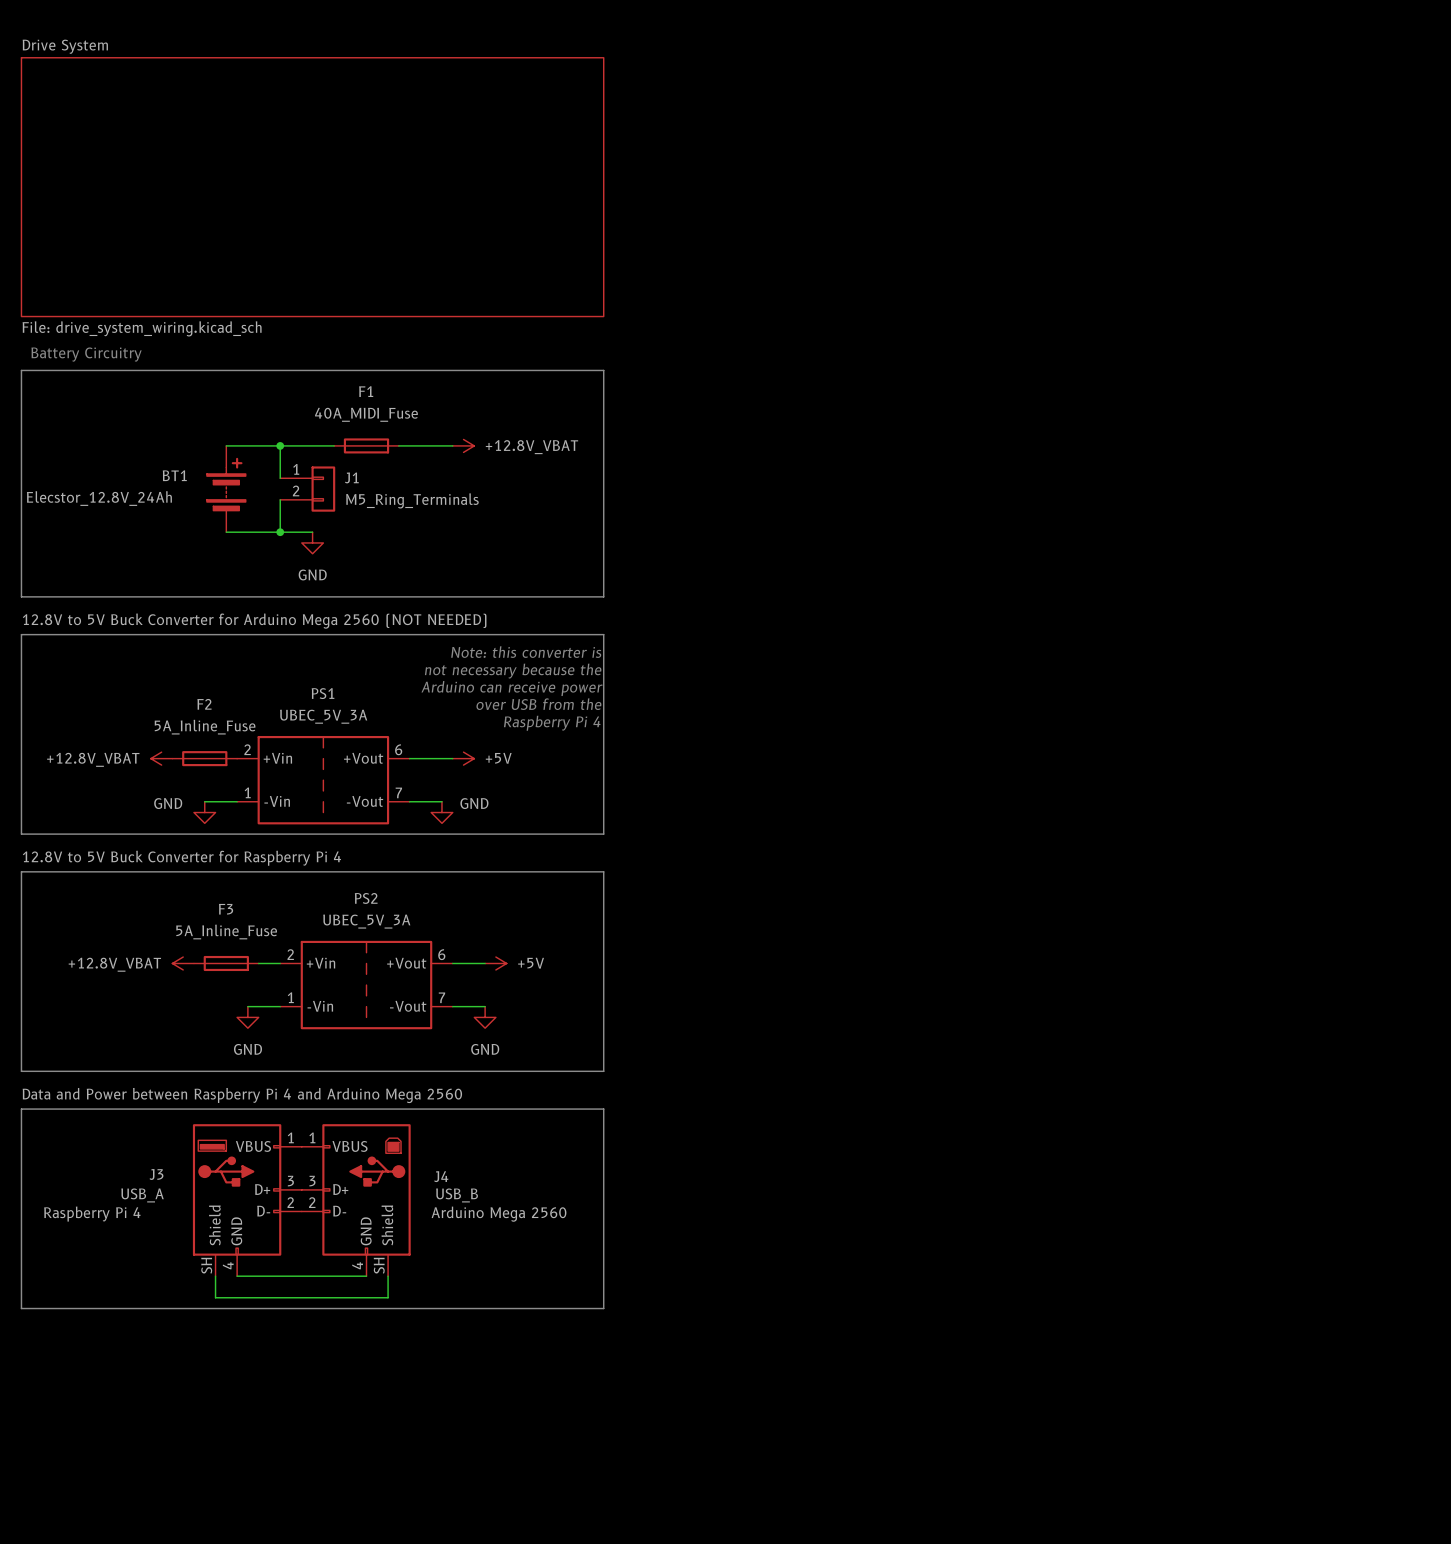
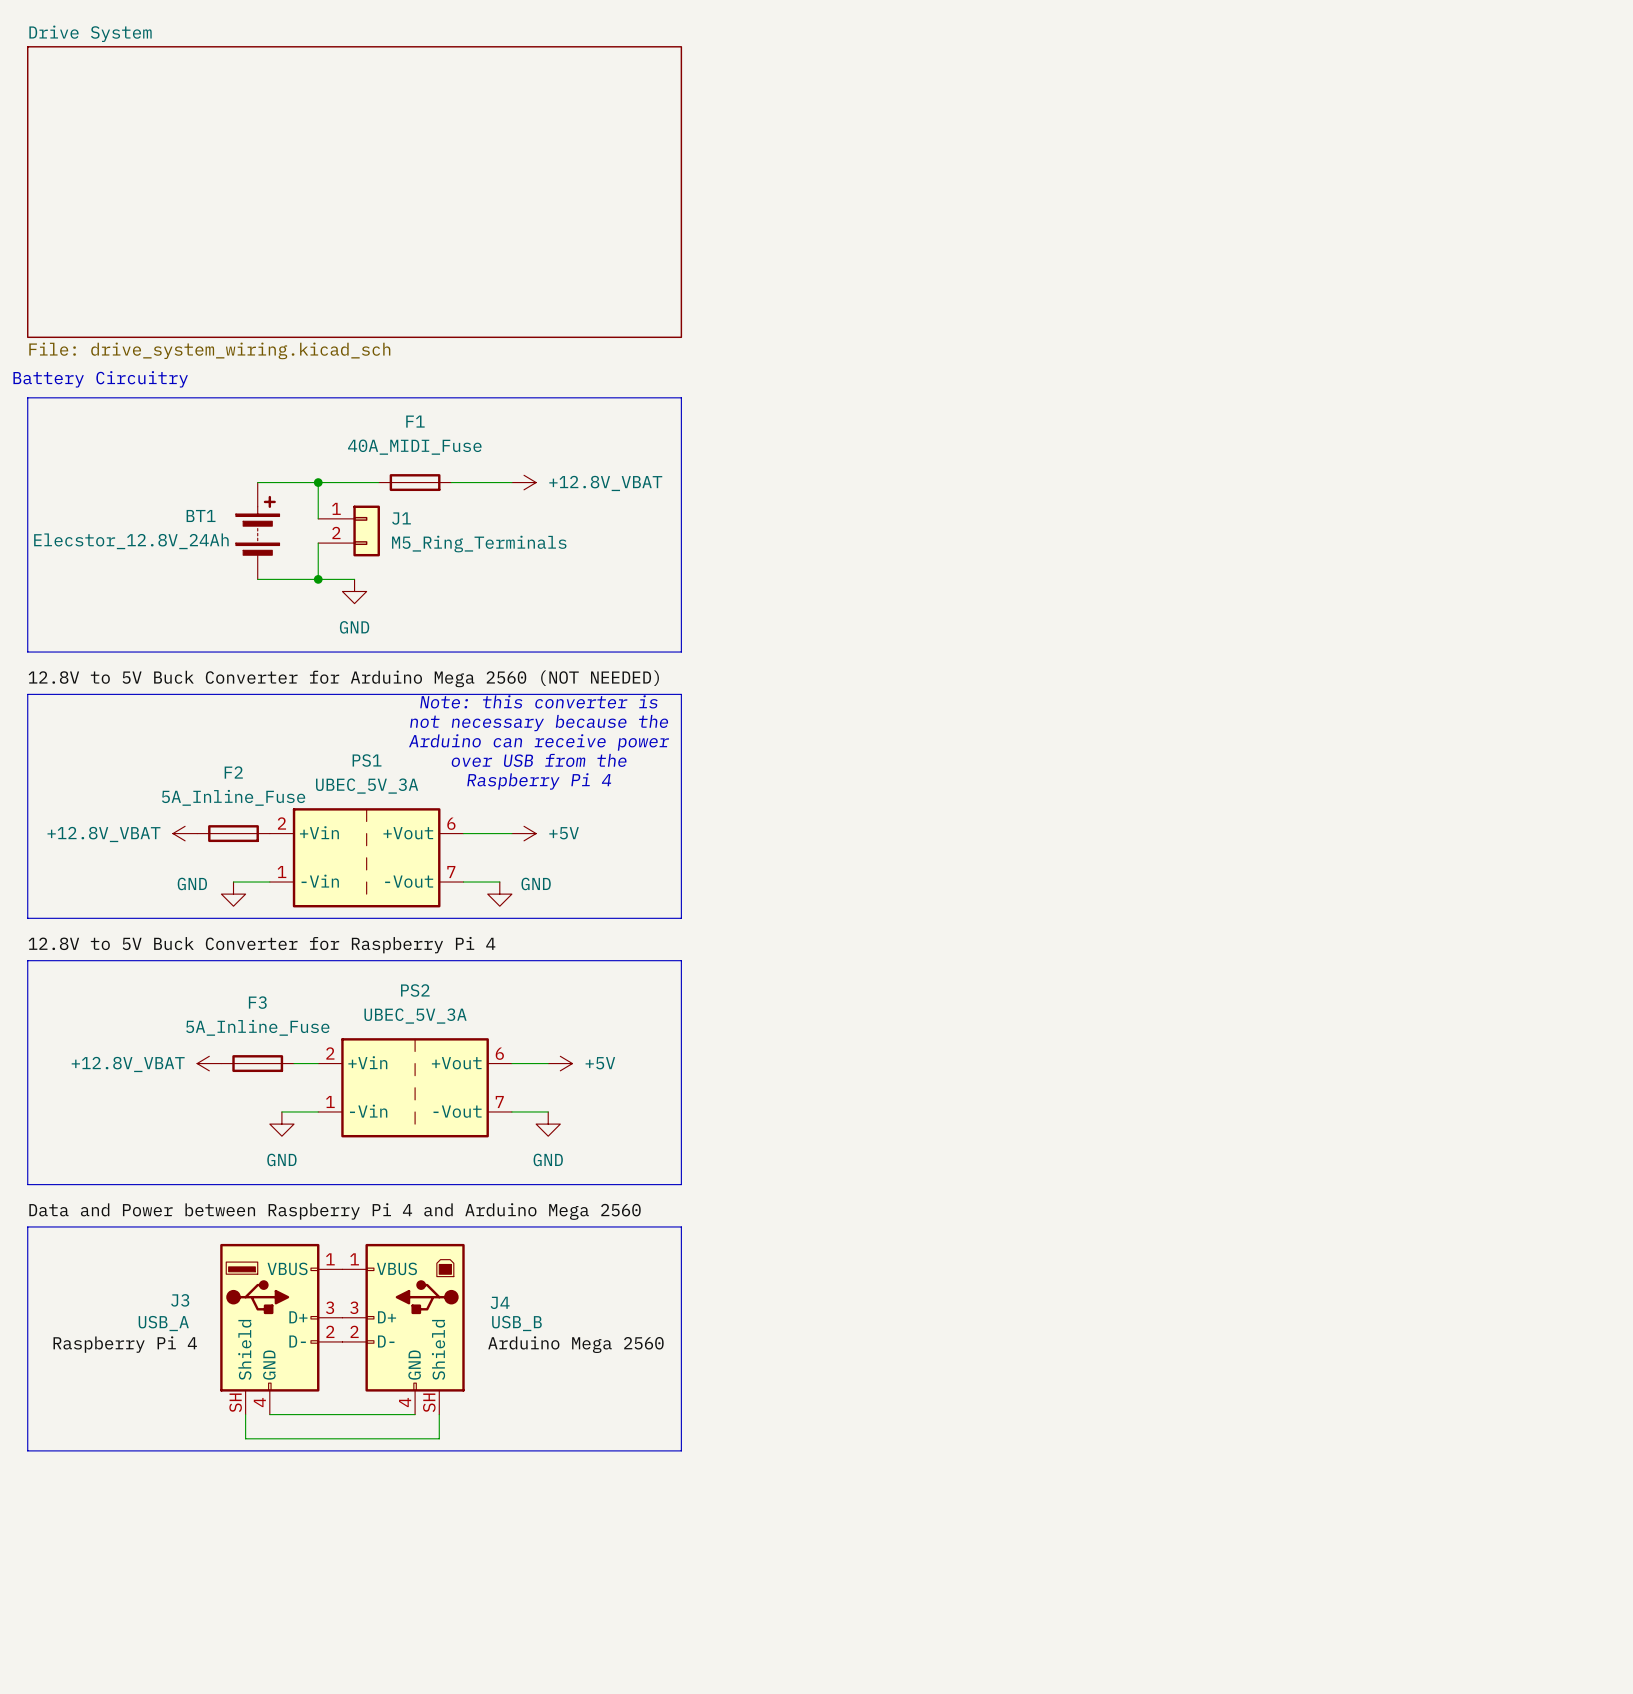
text position: Note: this converter is (526, 652) -> Note: this converter is (538, 701)
text position: not necessary because the (513, 671) -> not necessary because the (539, 723)
text position: Arduino can receive power (511, 688) -> Arduino can receive power (539, 742)
text position: over USB from the (538, 704) -> over USB from the (539, 760)
text position: Raspberry Pi 4 (552, 723) -> Raspberry Pi 4 (539, 781)

